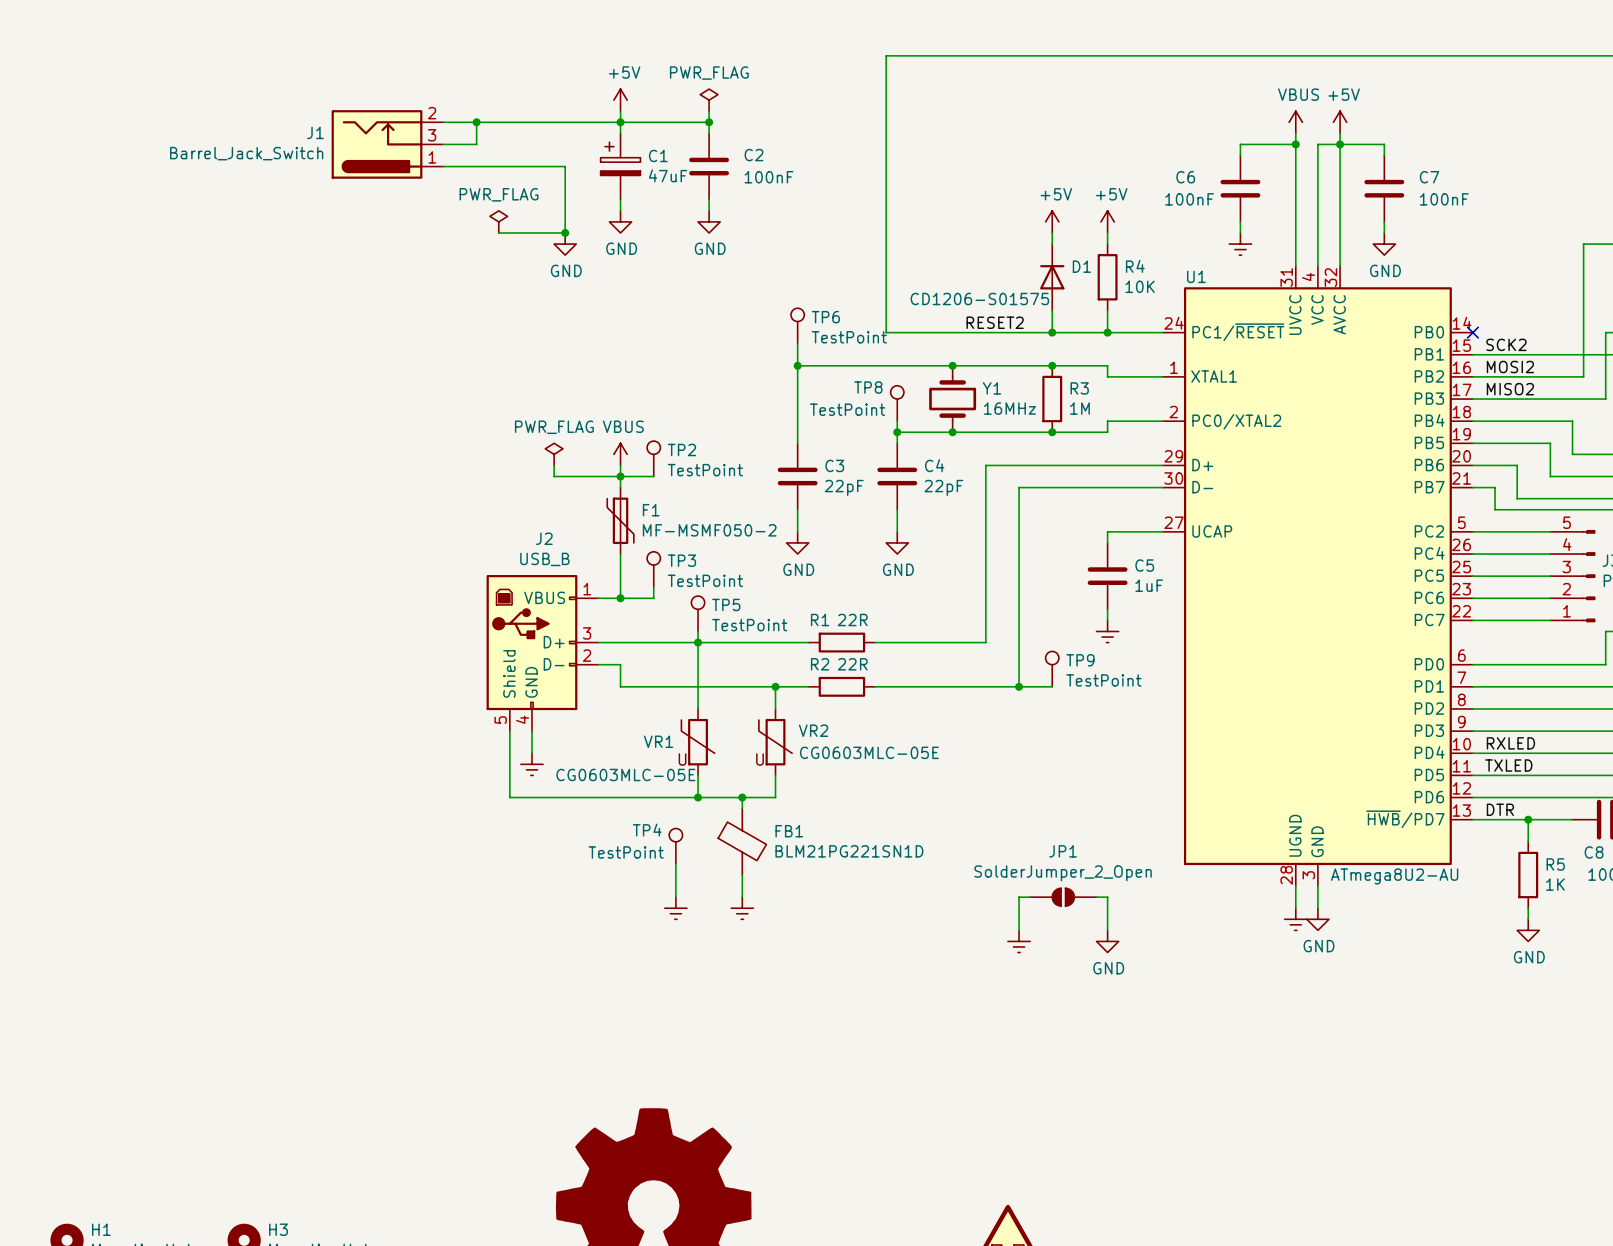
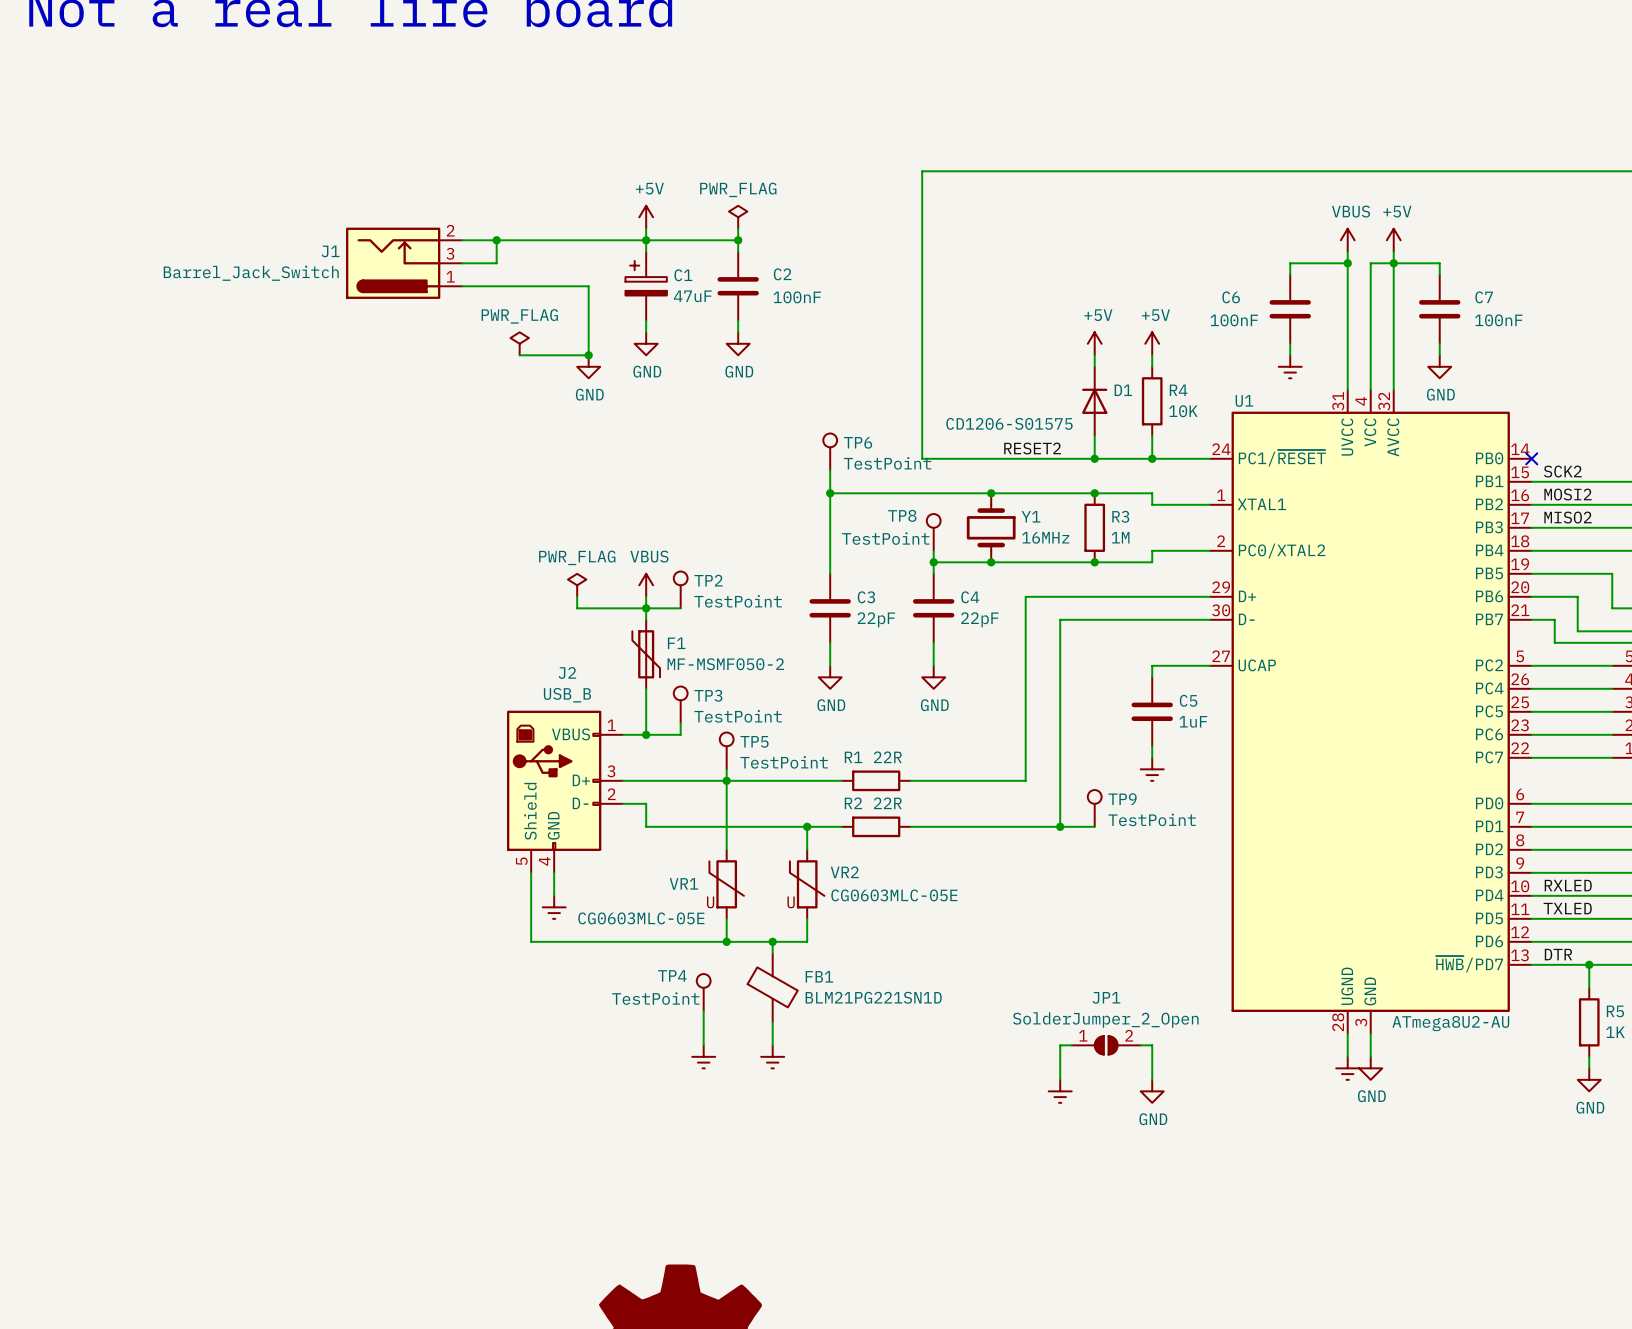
JP1 pin number: none -> 1 (1083, 1035)
JP1 pin number: none -> 2 (1129, 1035)

